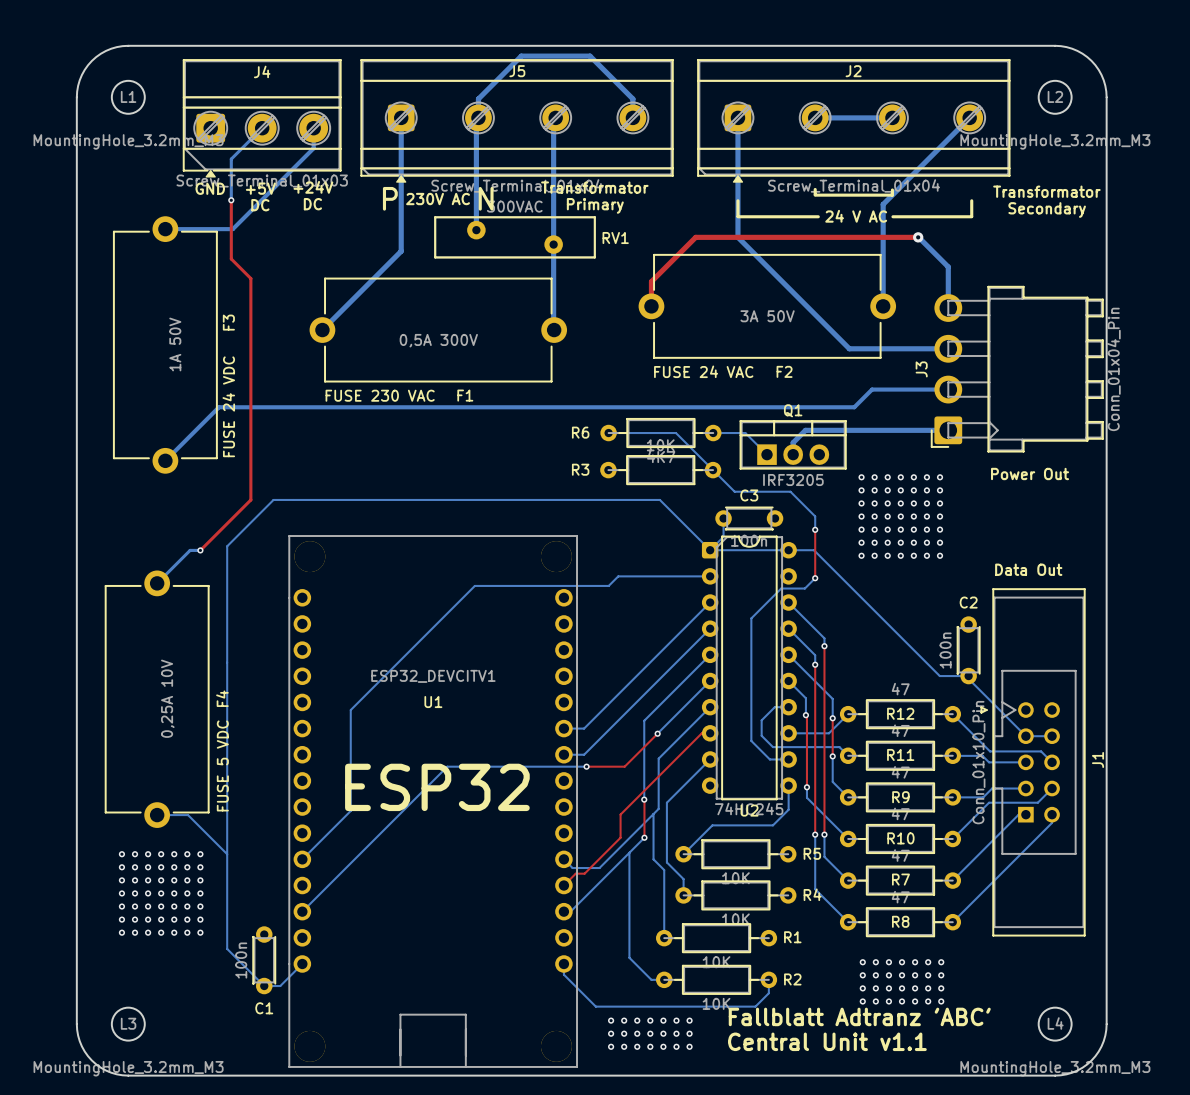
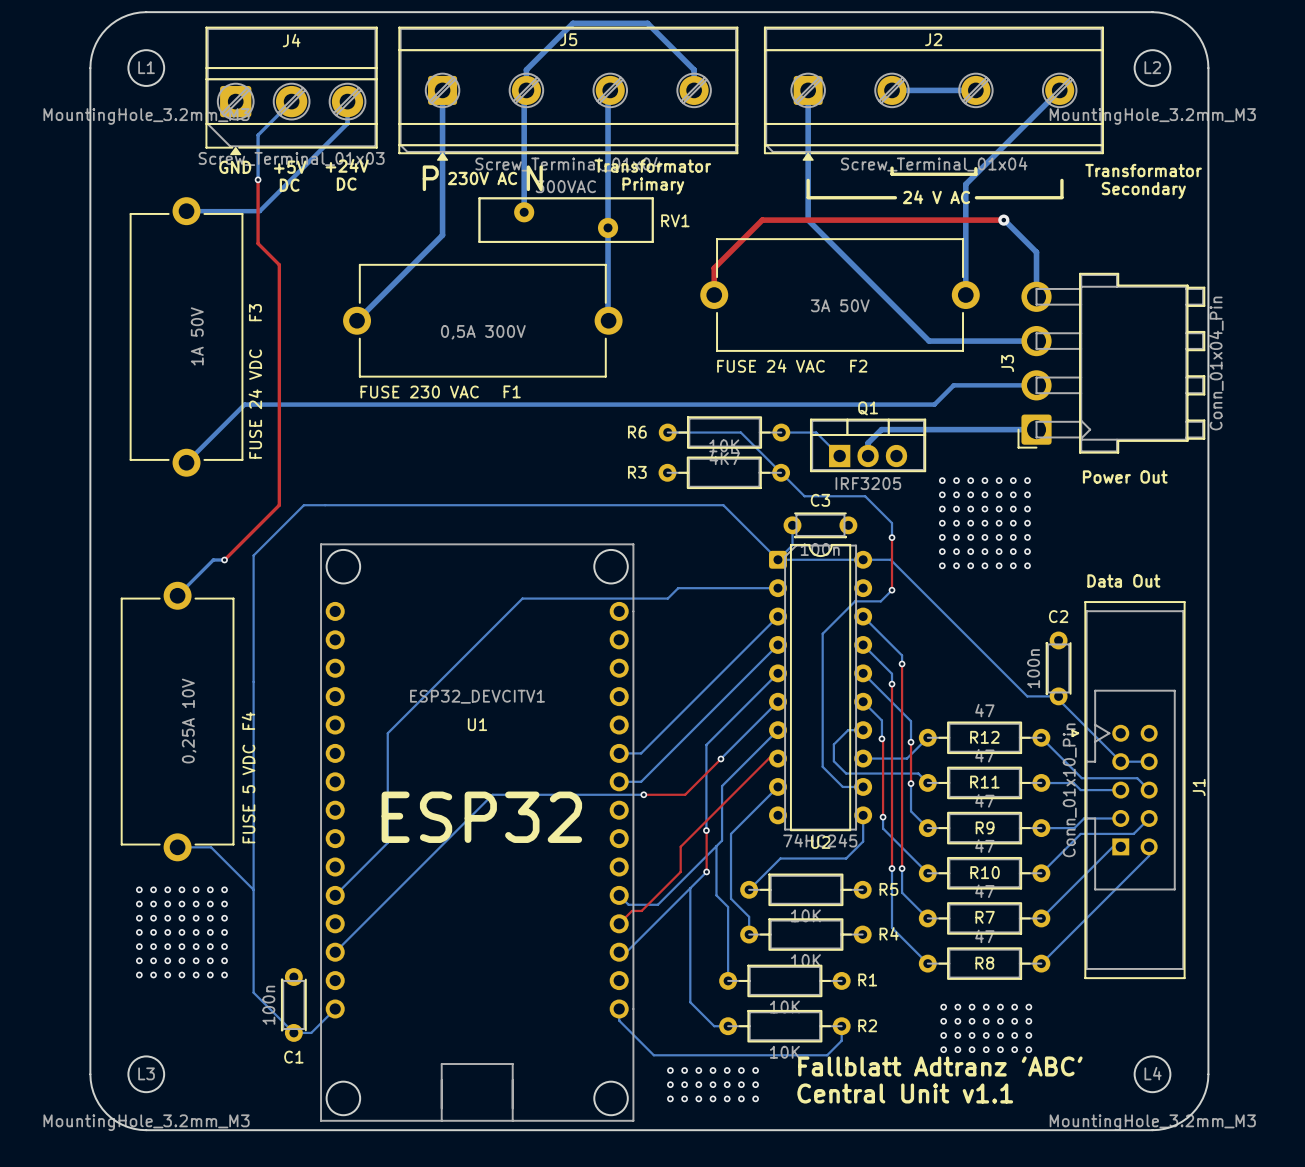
U1 footprint: [288, 535, 578, 1068] -> [320, 543, 635, 1122]

